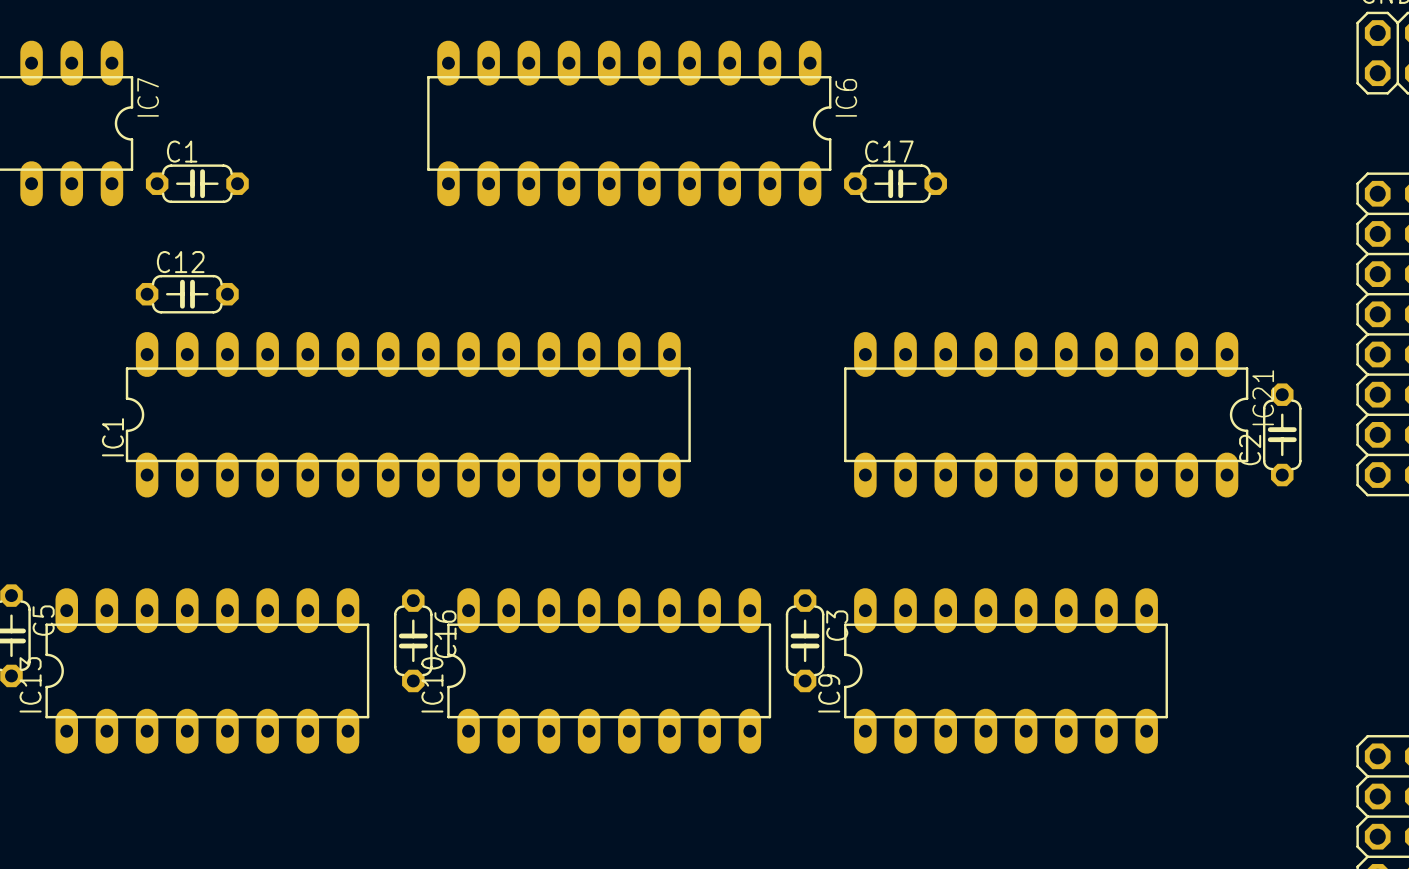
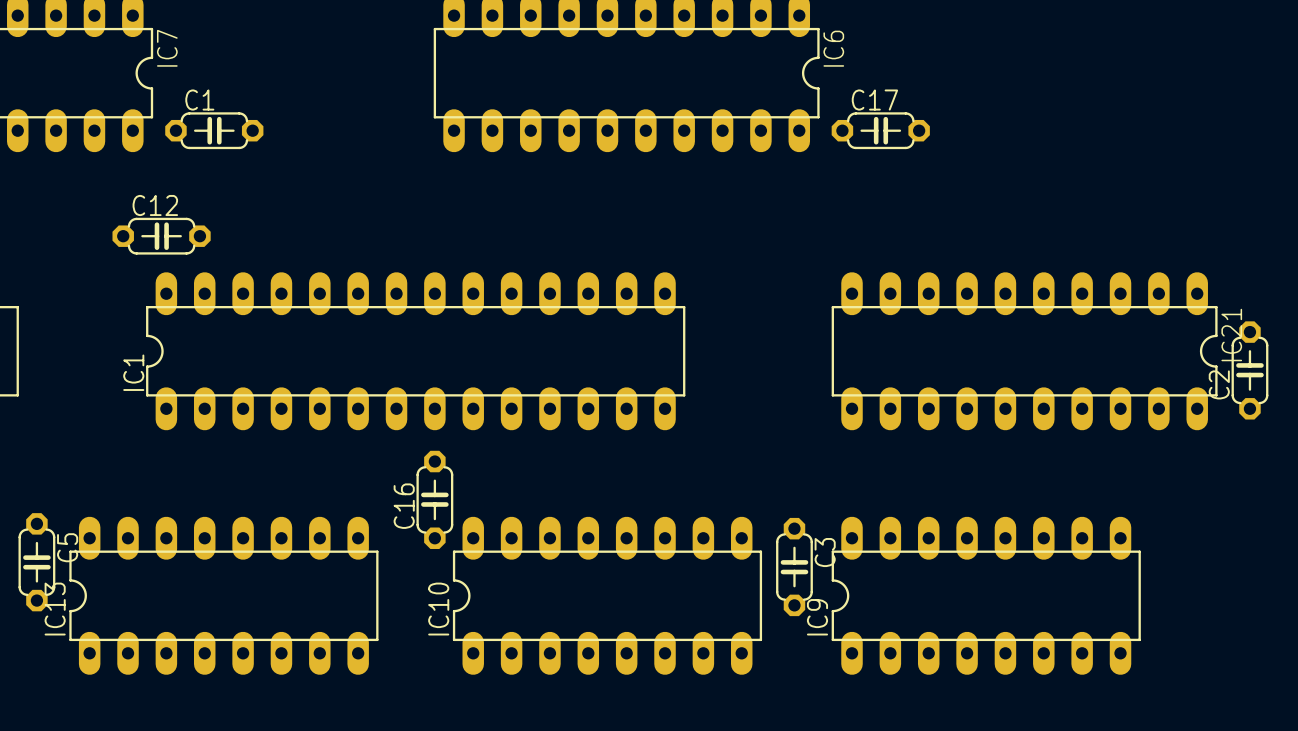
C12 position: (187, 294) -> (161, 236)
C16 rotation: 0° (413, 640) -> 180° (434, 499)
C16 position: (413, 640) -> (434, 499)

